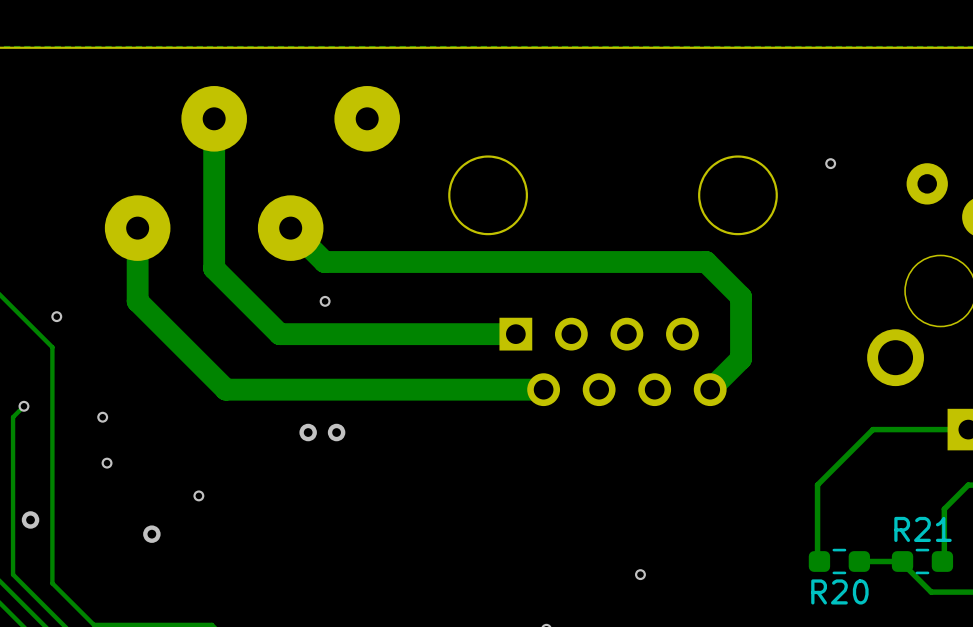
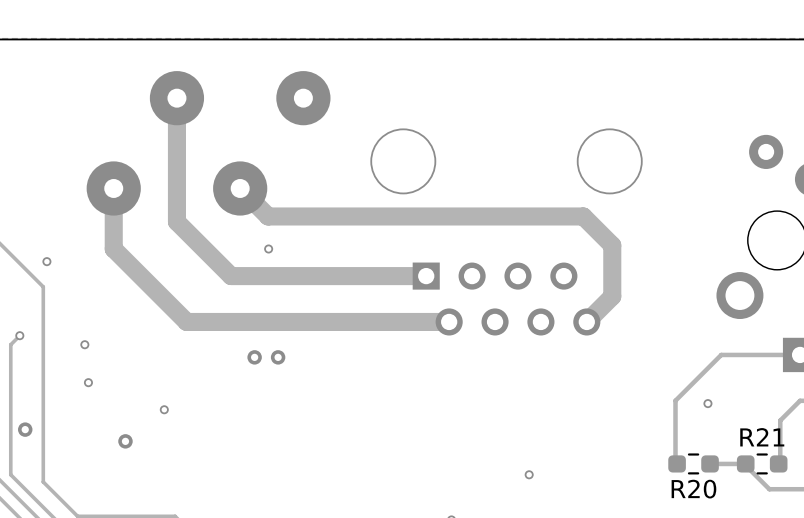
via: (830, 163) -> none
via: none -> (707, 403)

